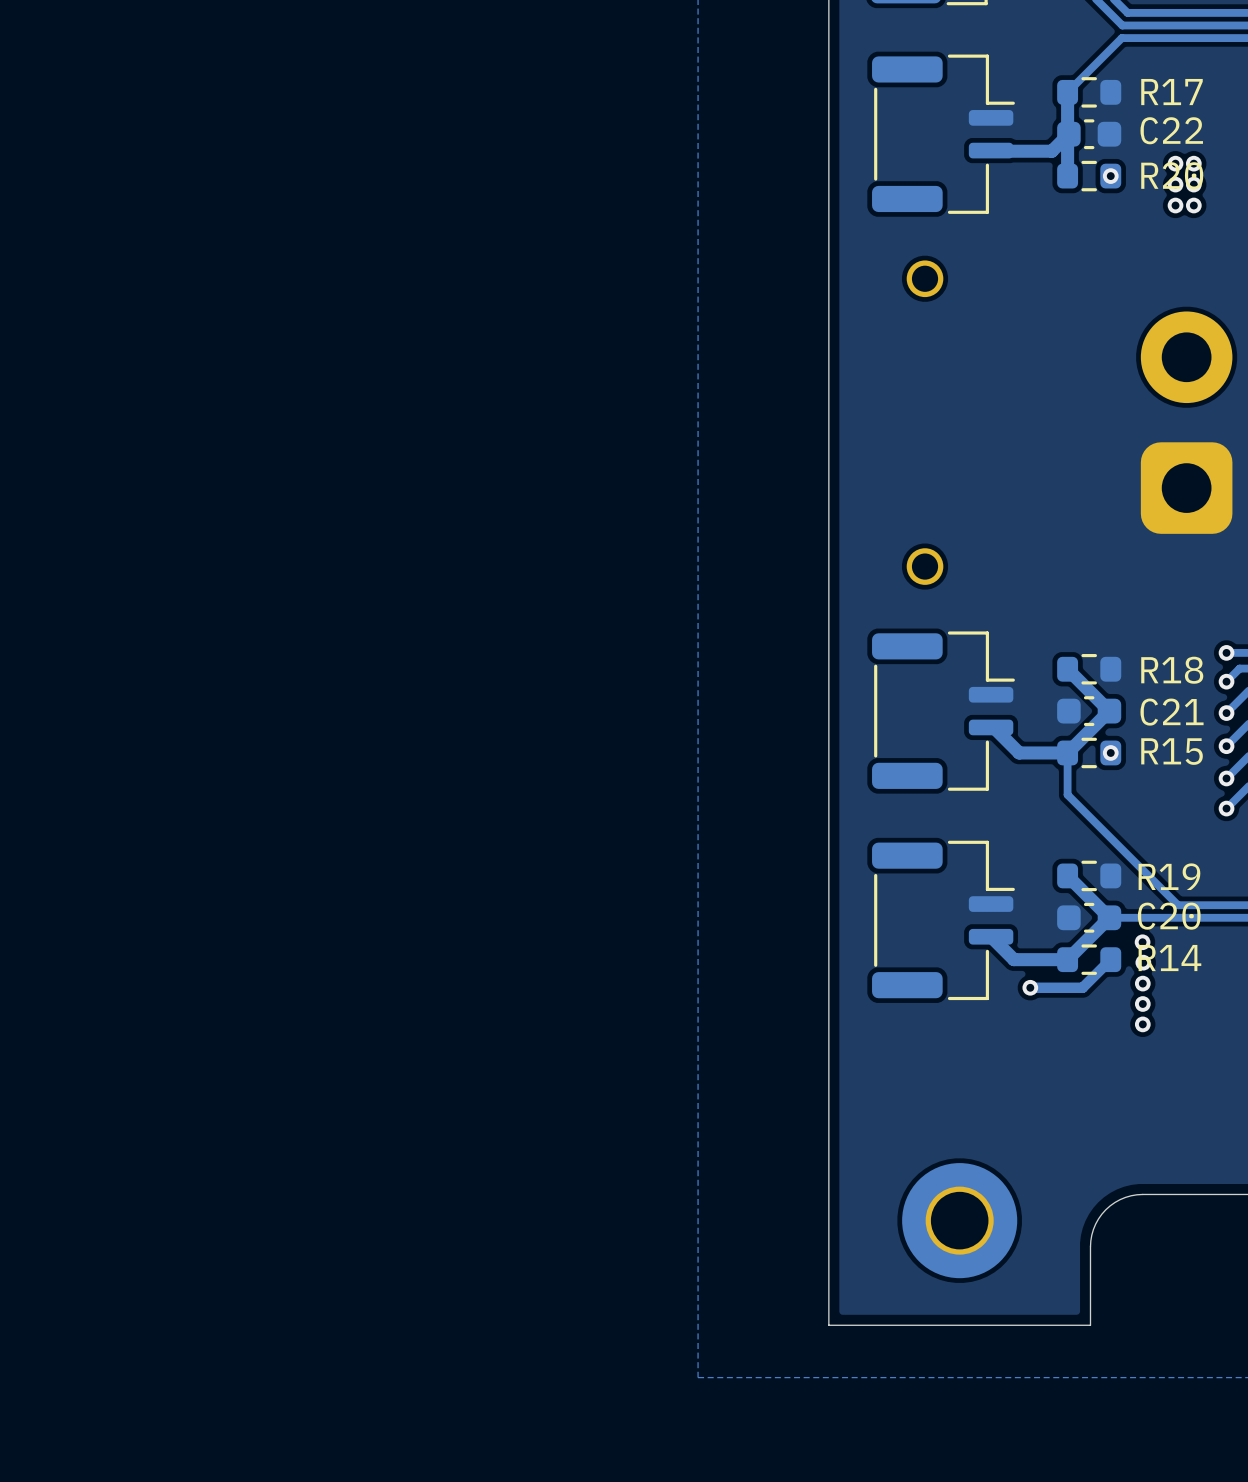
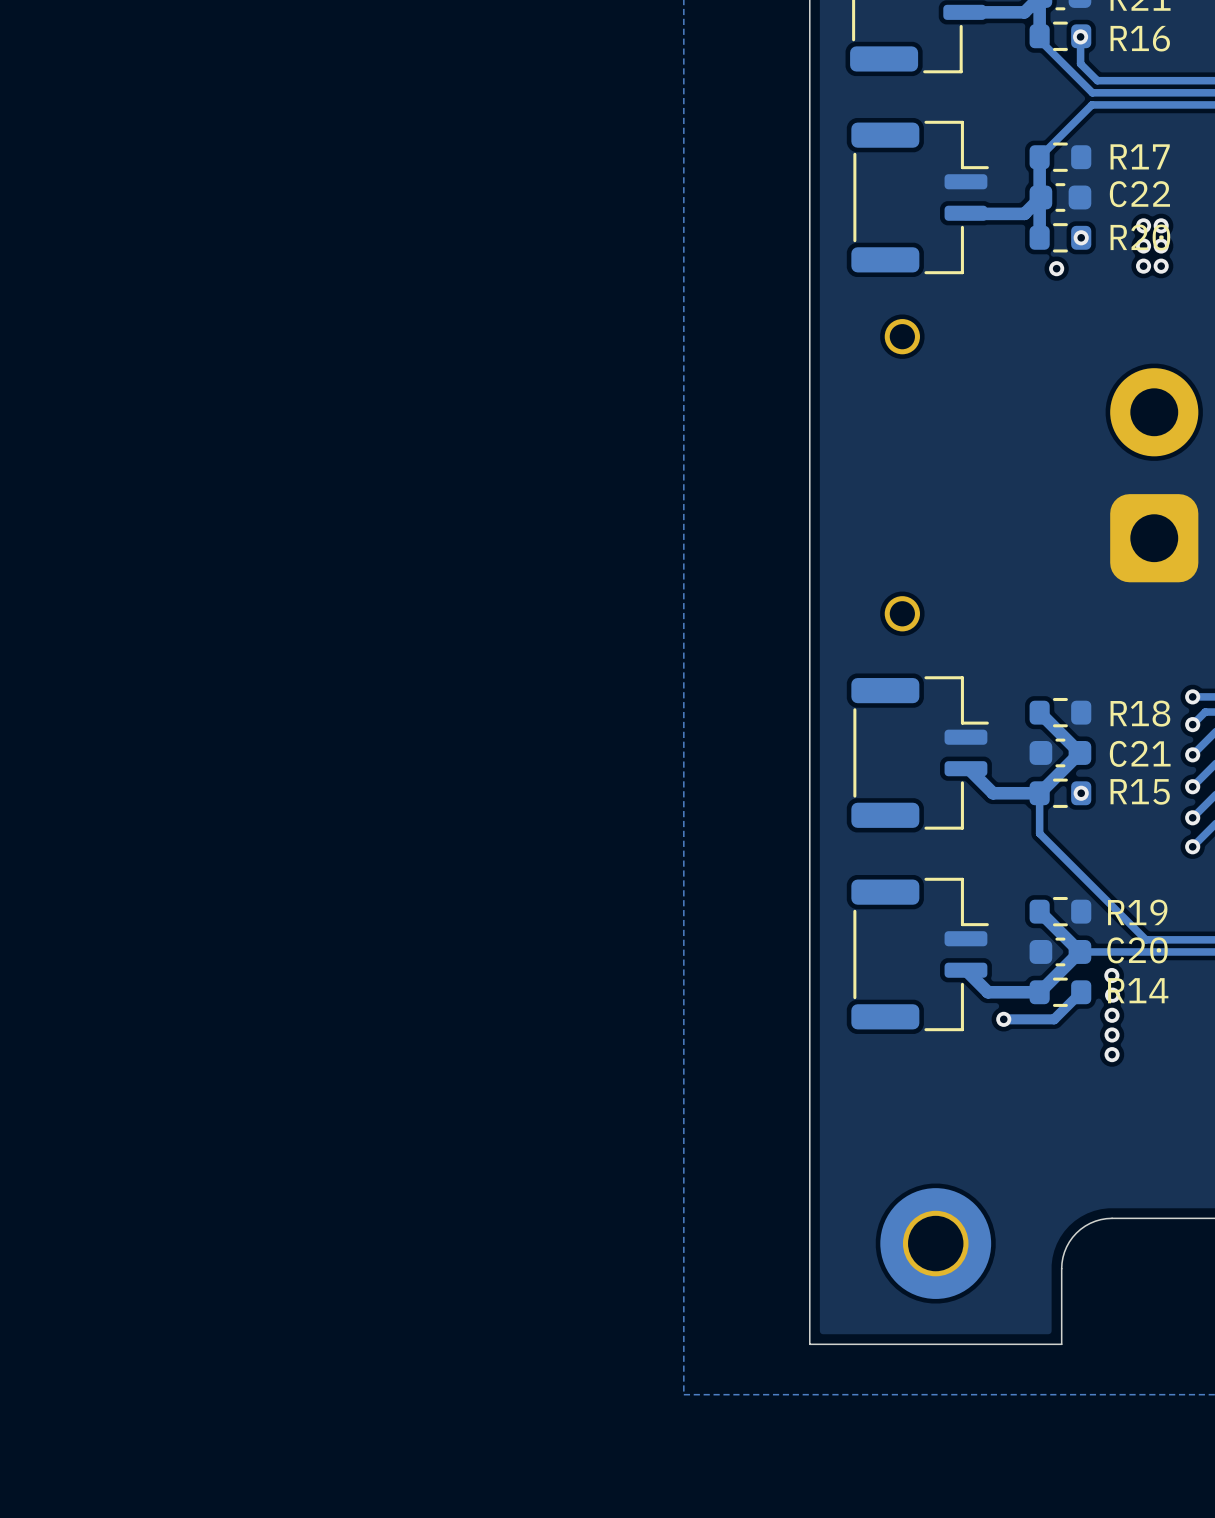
via: none -> (1056, 268)

